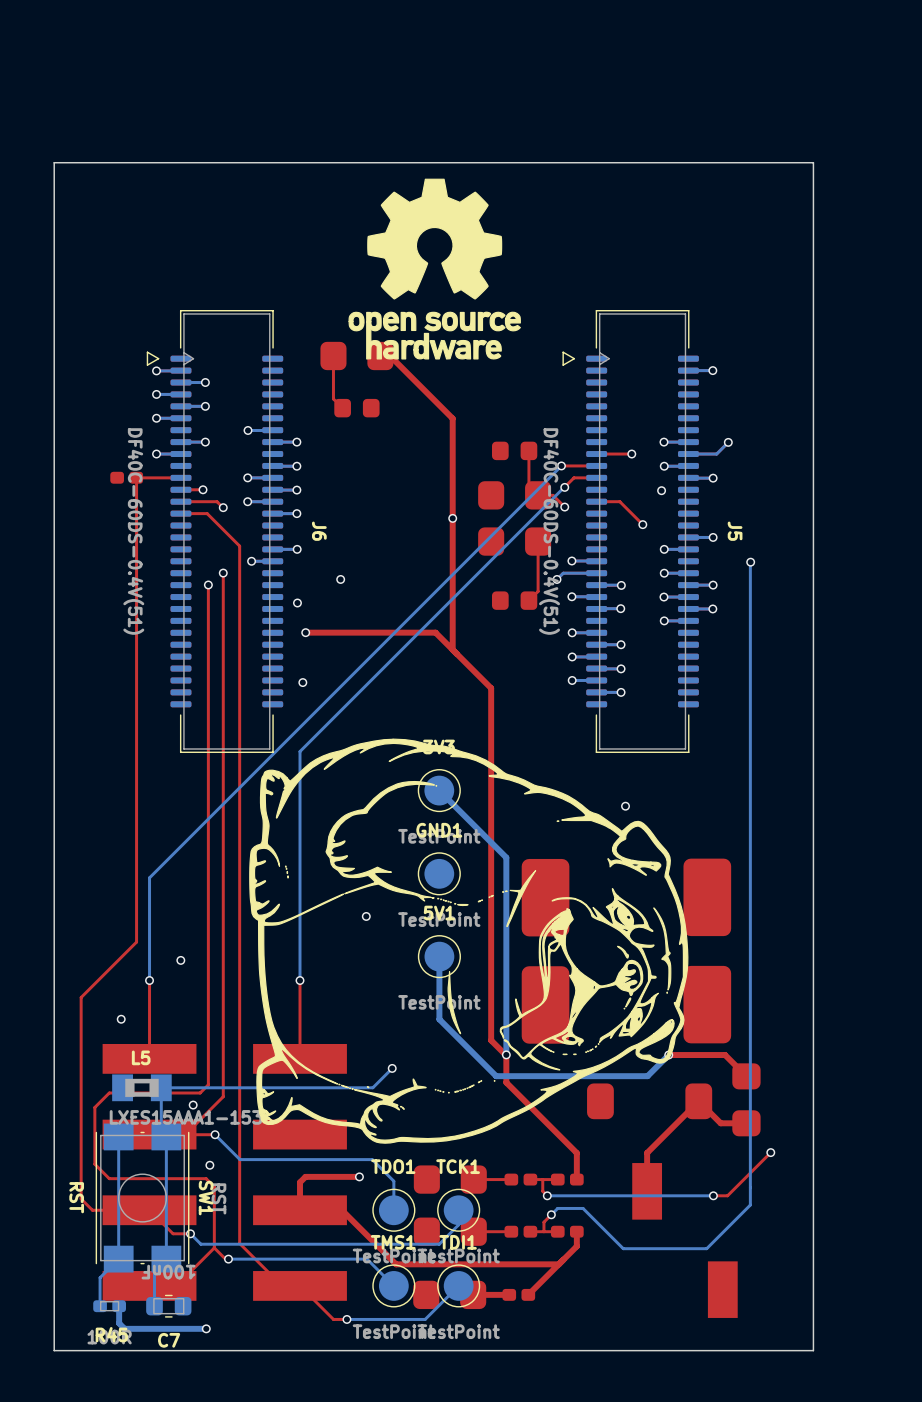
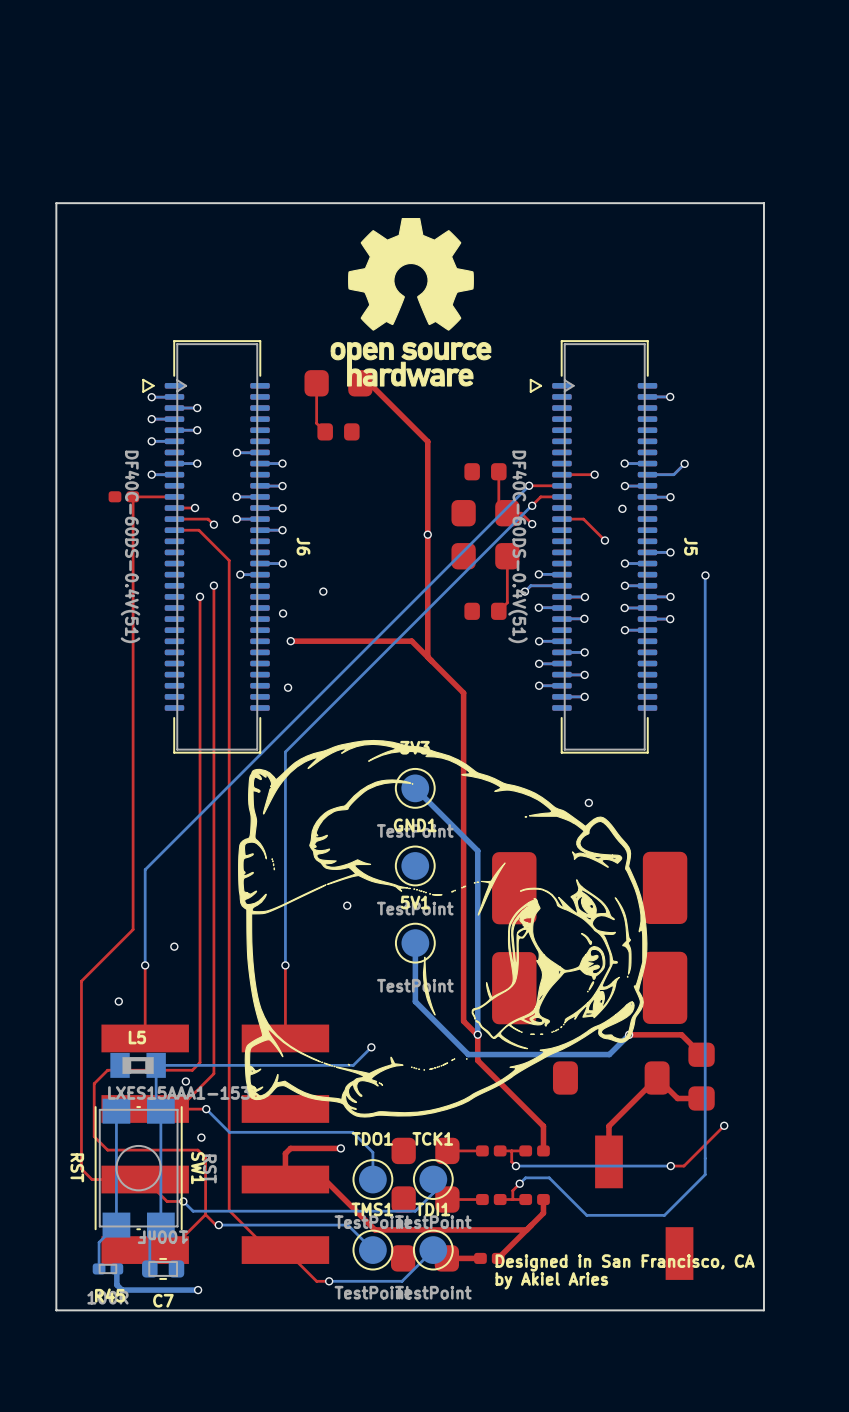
text: none -> Designed in San Francisco, CA (625, 1262)
text: none -> by Akiel Aries (551, 1280)

